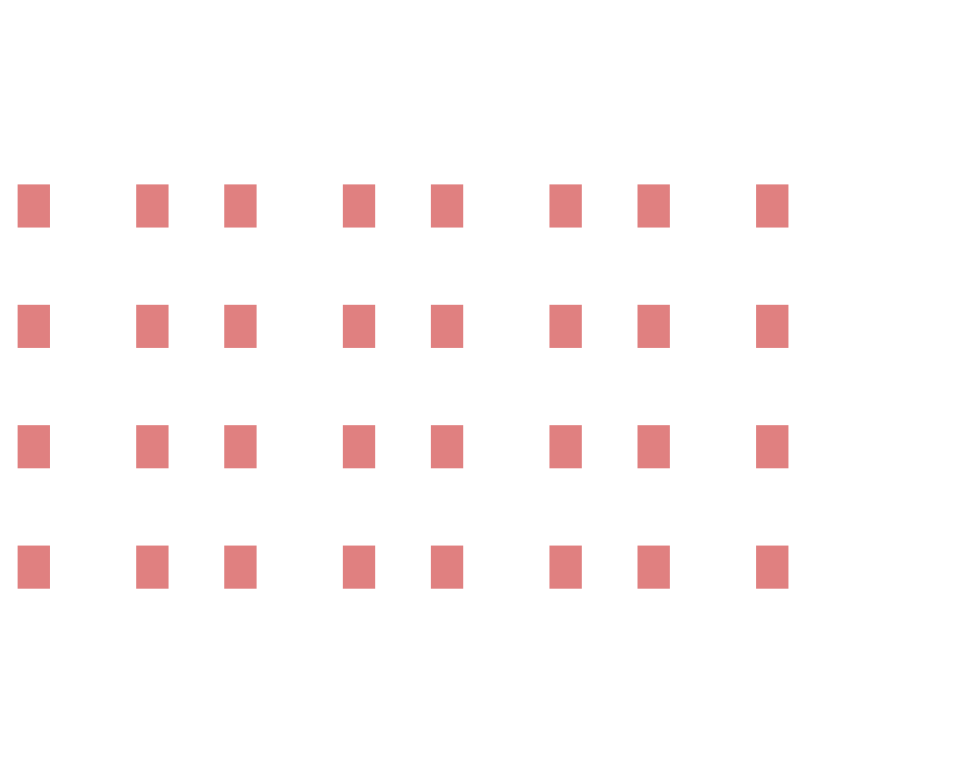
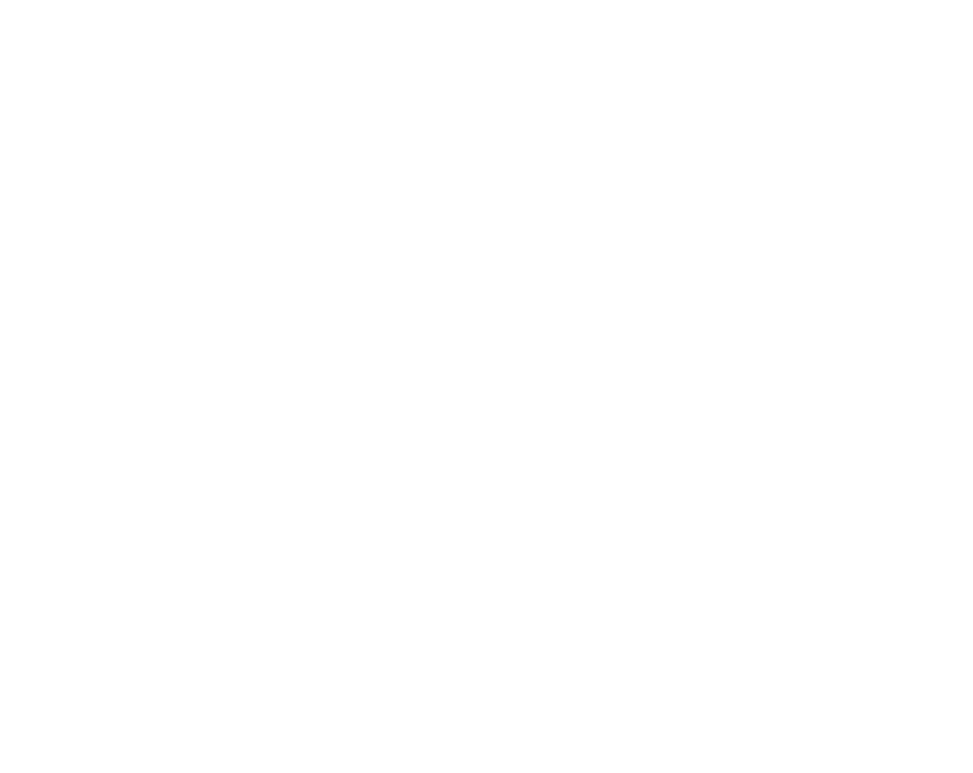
part: (93, 205) -> none
part: (299, 205) -> none
part: (506, 205) -> none
part: (712, 205) -> none
part: (93, 326) -> none
part: (299, 326) -> none
part: (506, 326) -> none
part: (712, 326) -> none
part: (93, 446) -> none
part: (299, 446) -> none
part: (506, 446) -> none
part: (712, 446) -> none
part: (93, 567) -> none
part: (299, 567) -> none
part: (506, 567) -> none
part: (712, 567) -> none

